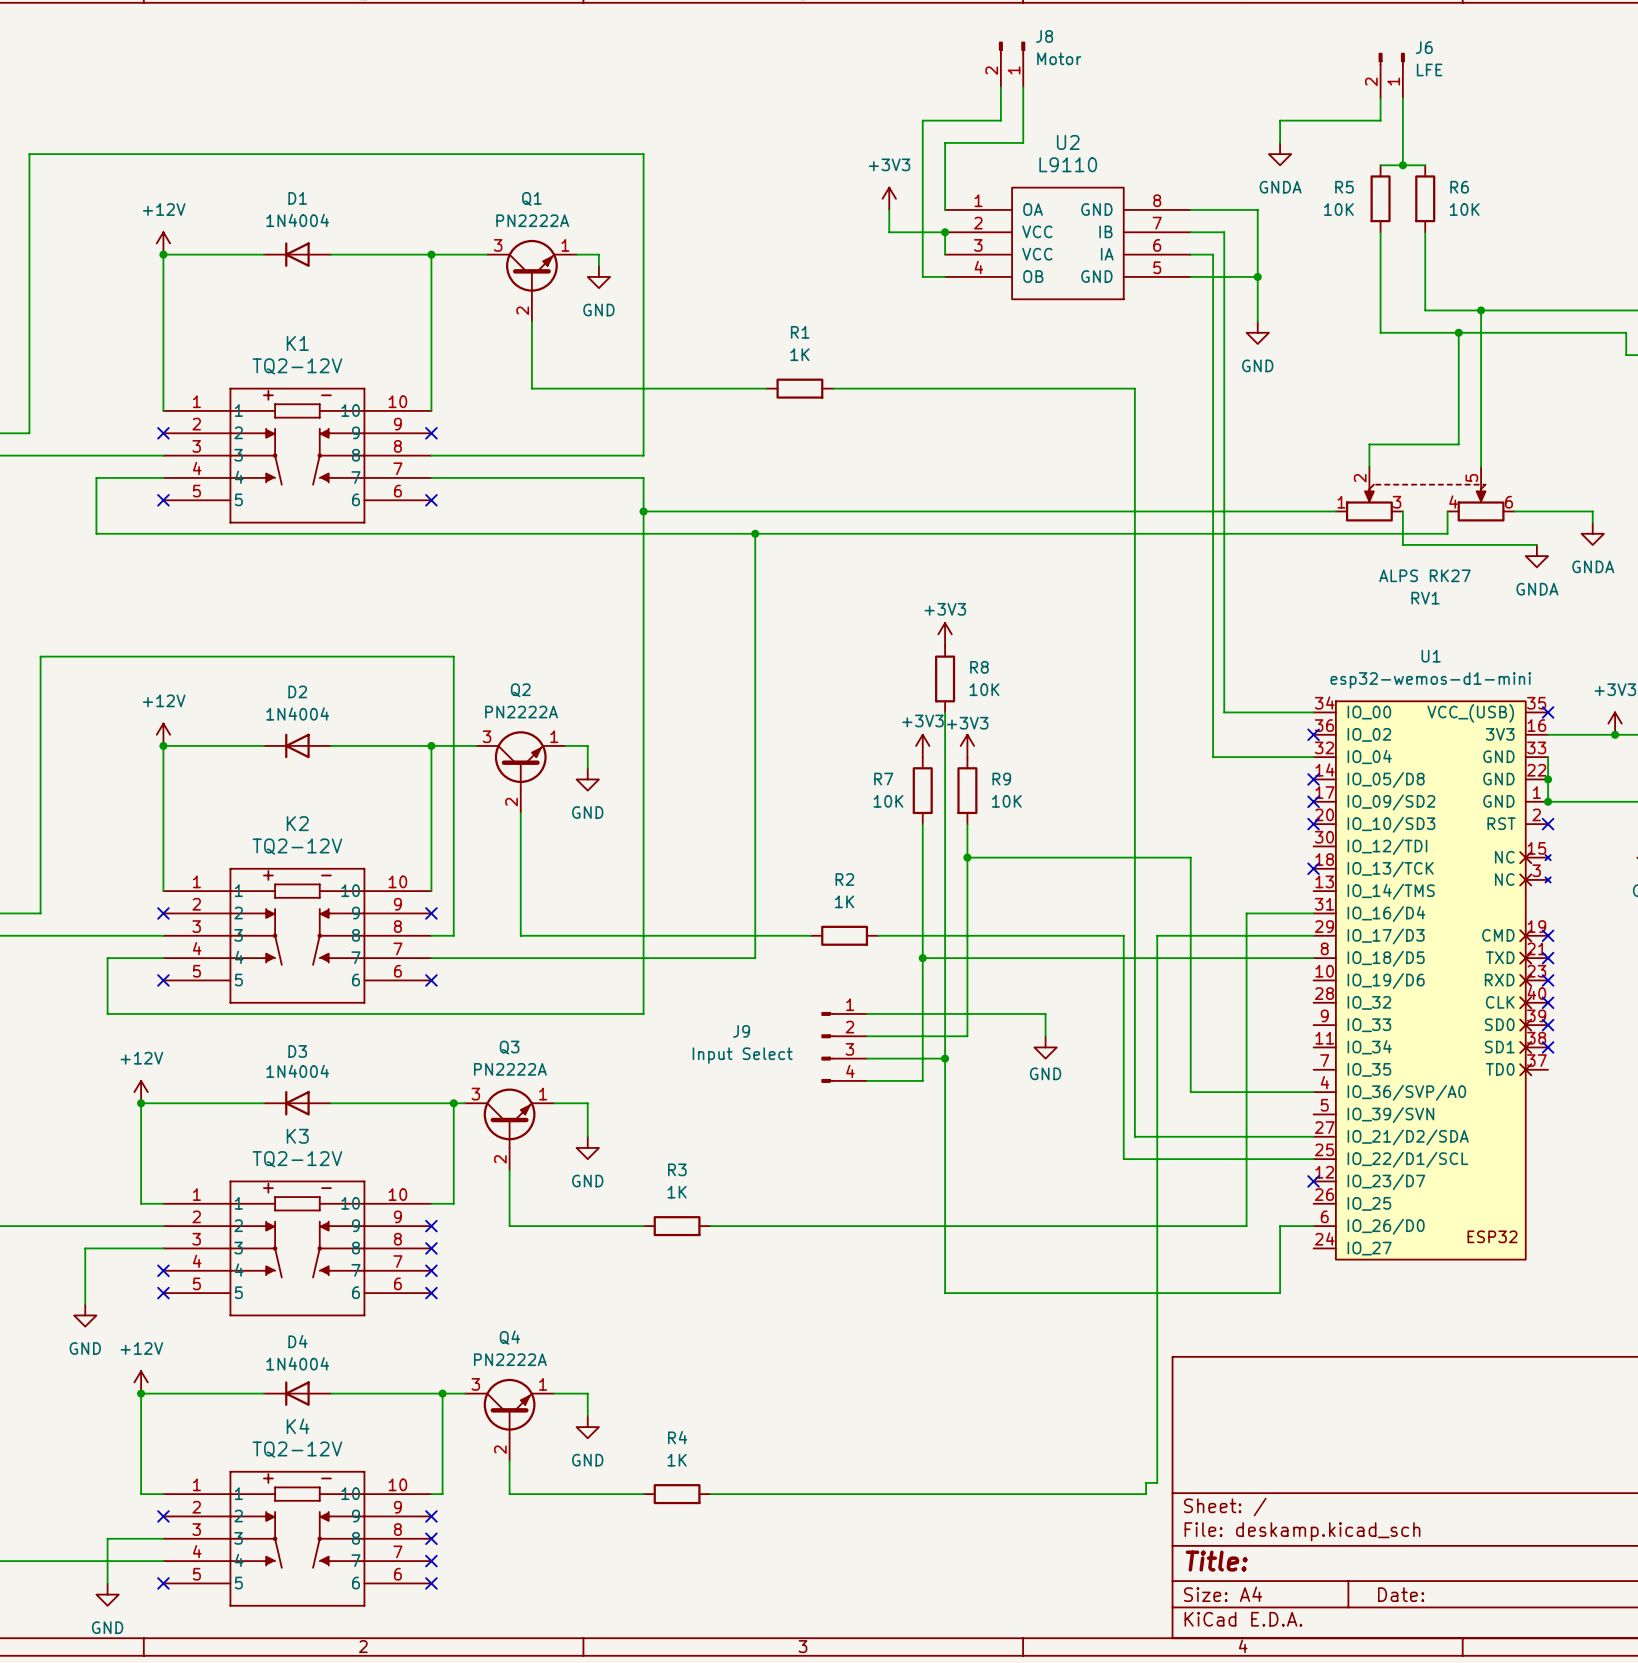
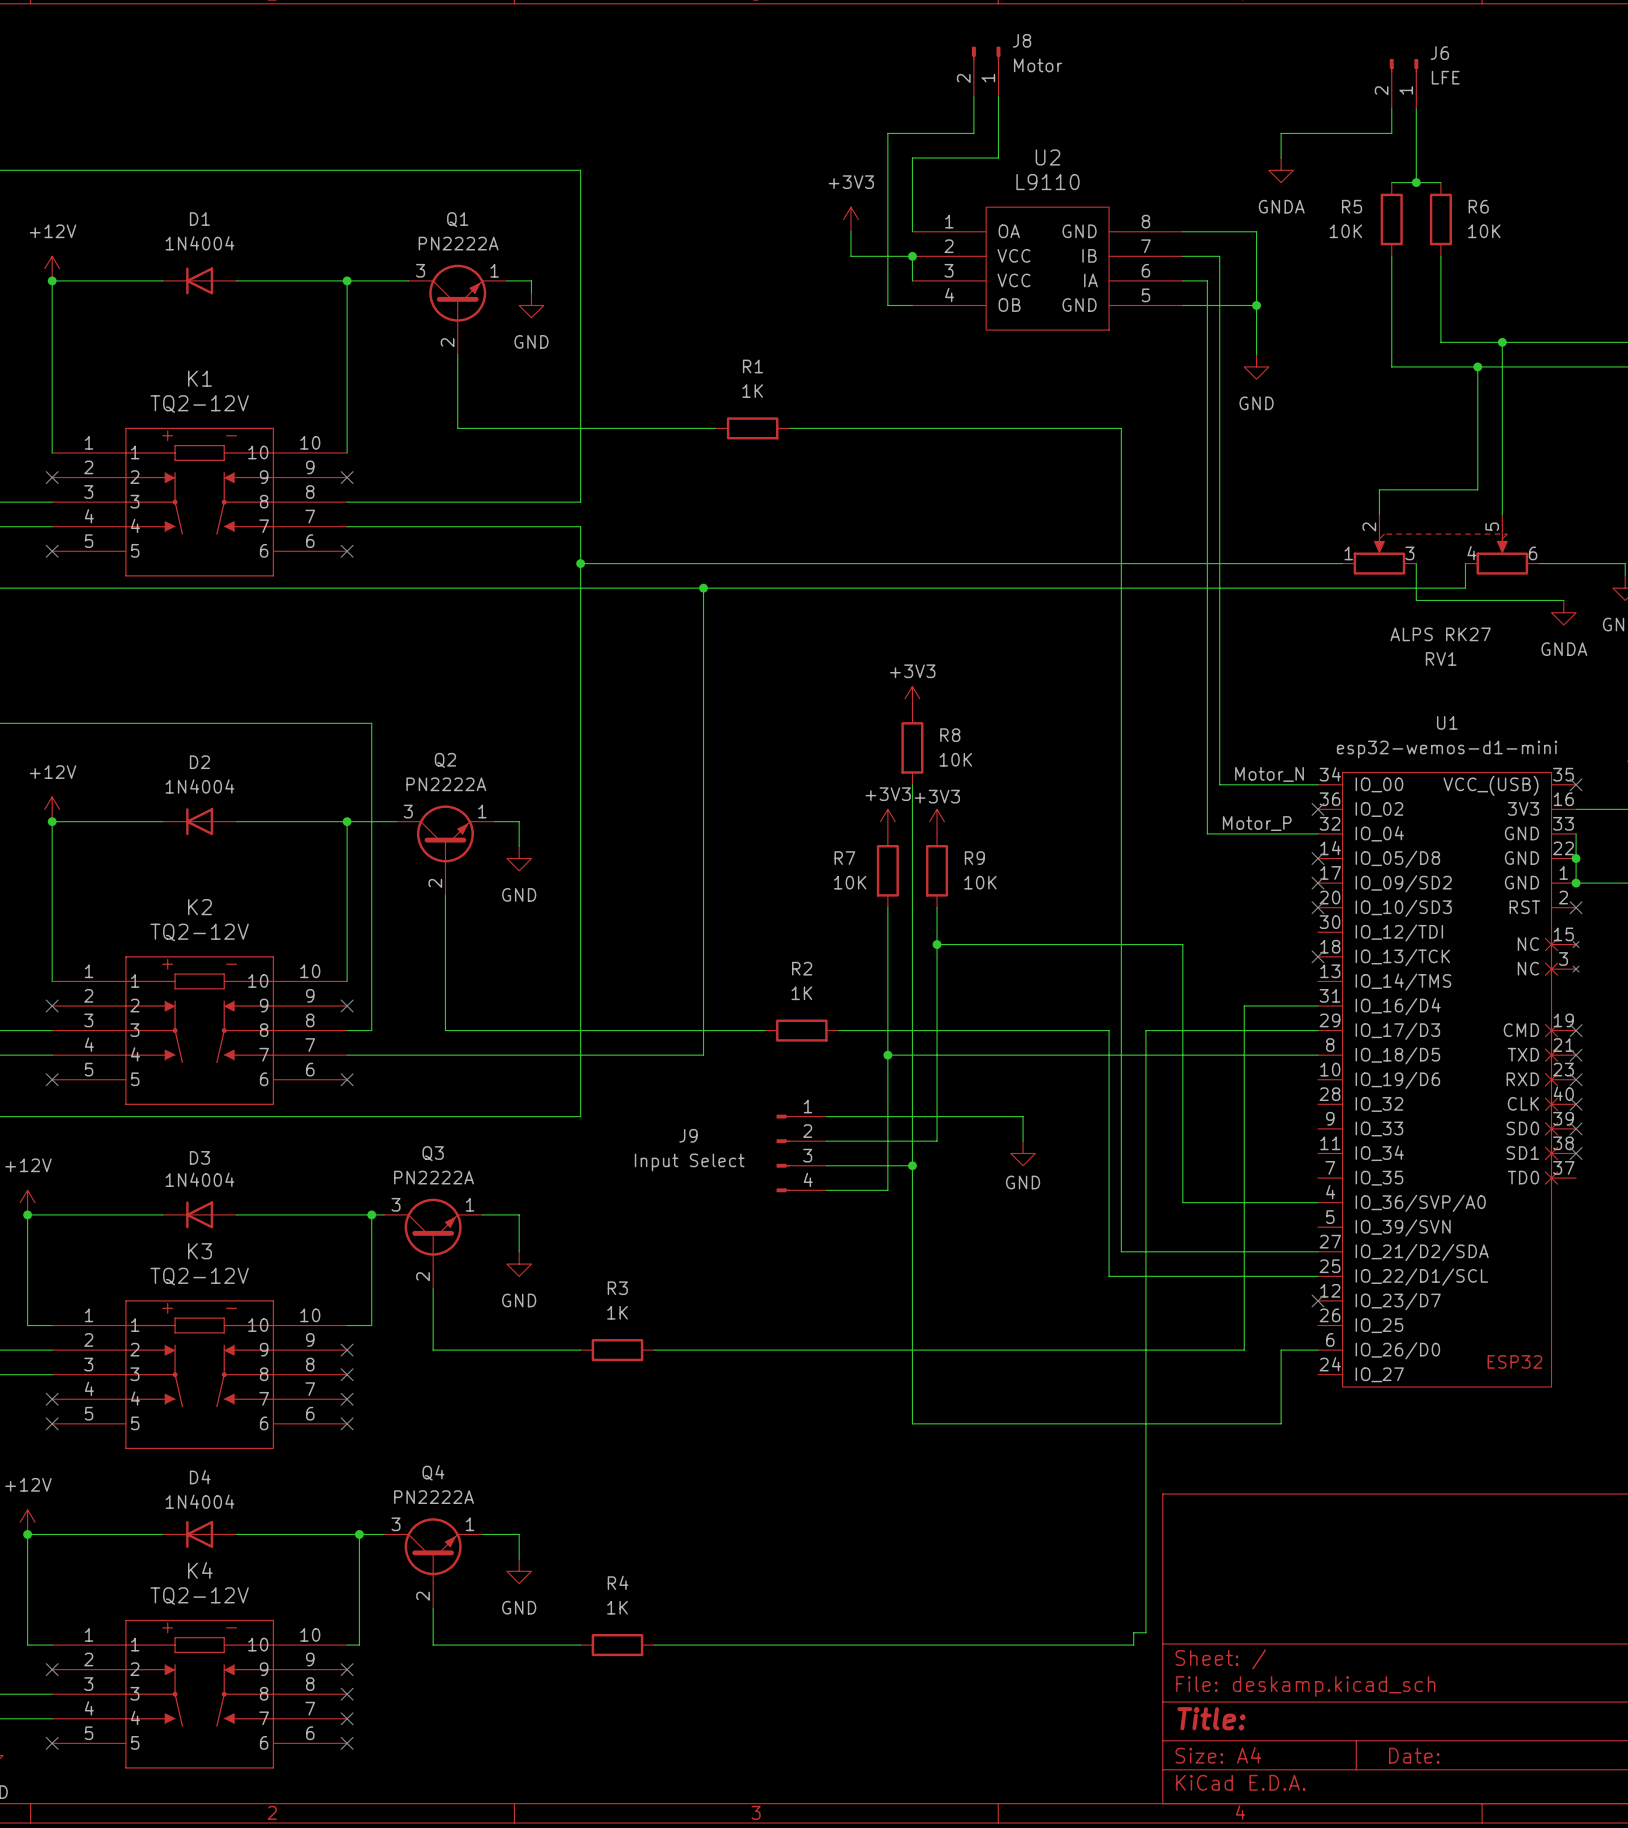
label: none -> Motor_N (1269, 774)
label: none -> Motor_P (1257, 823)

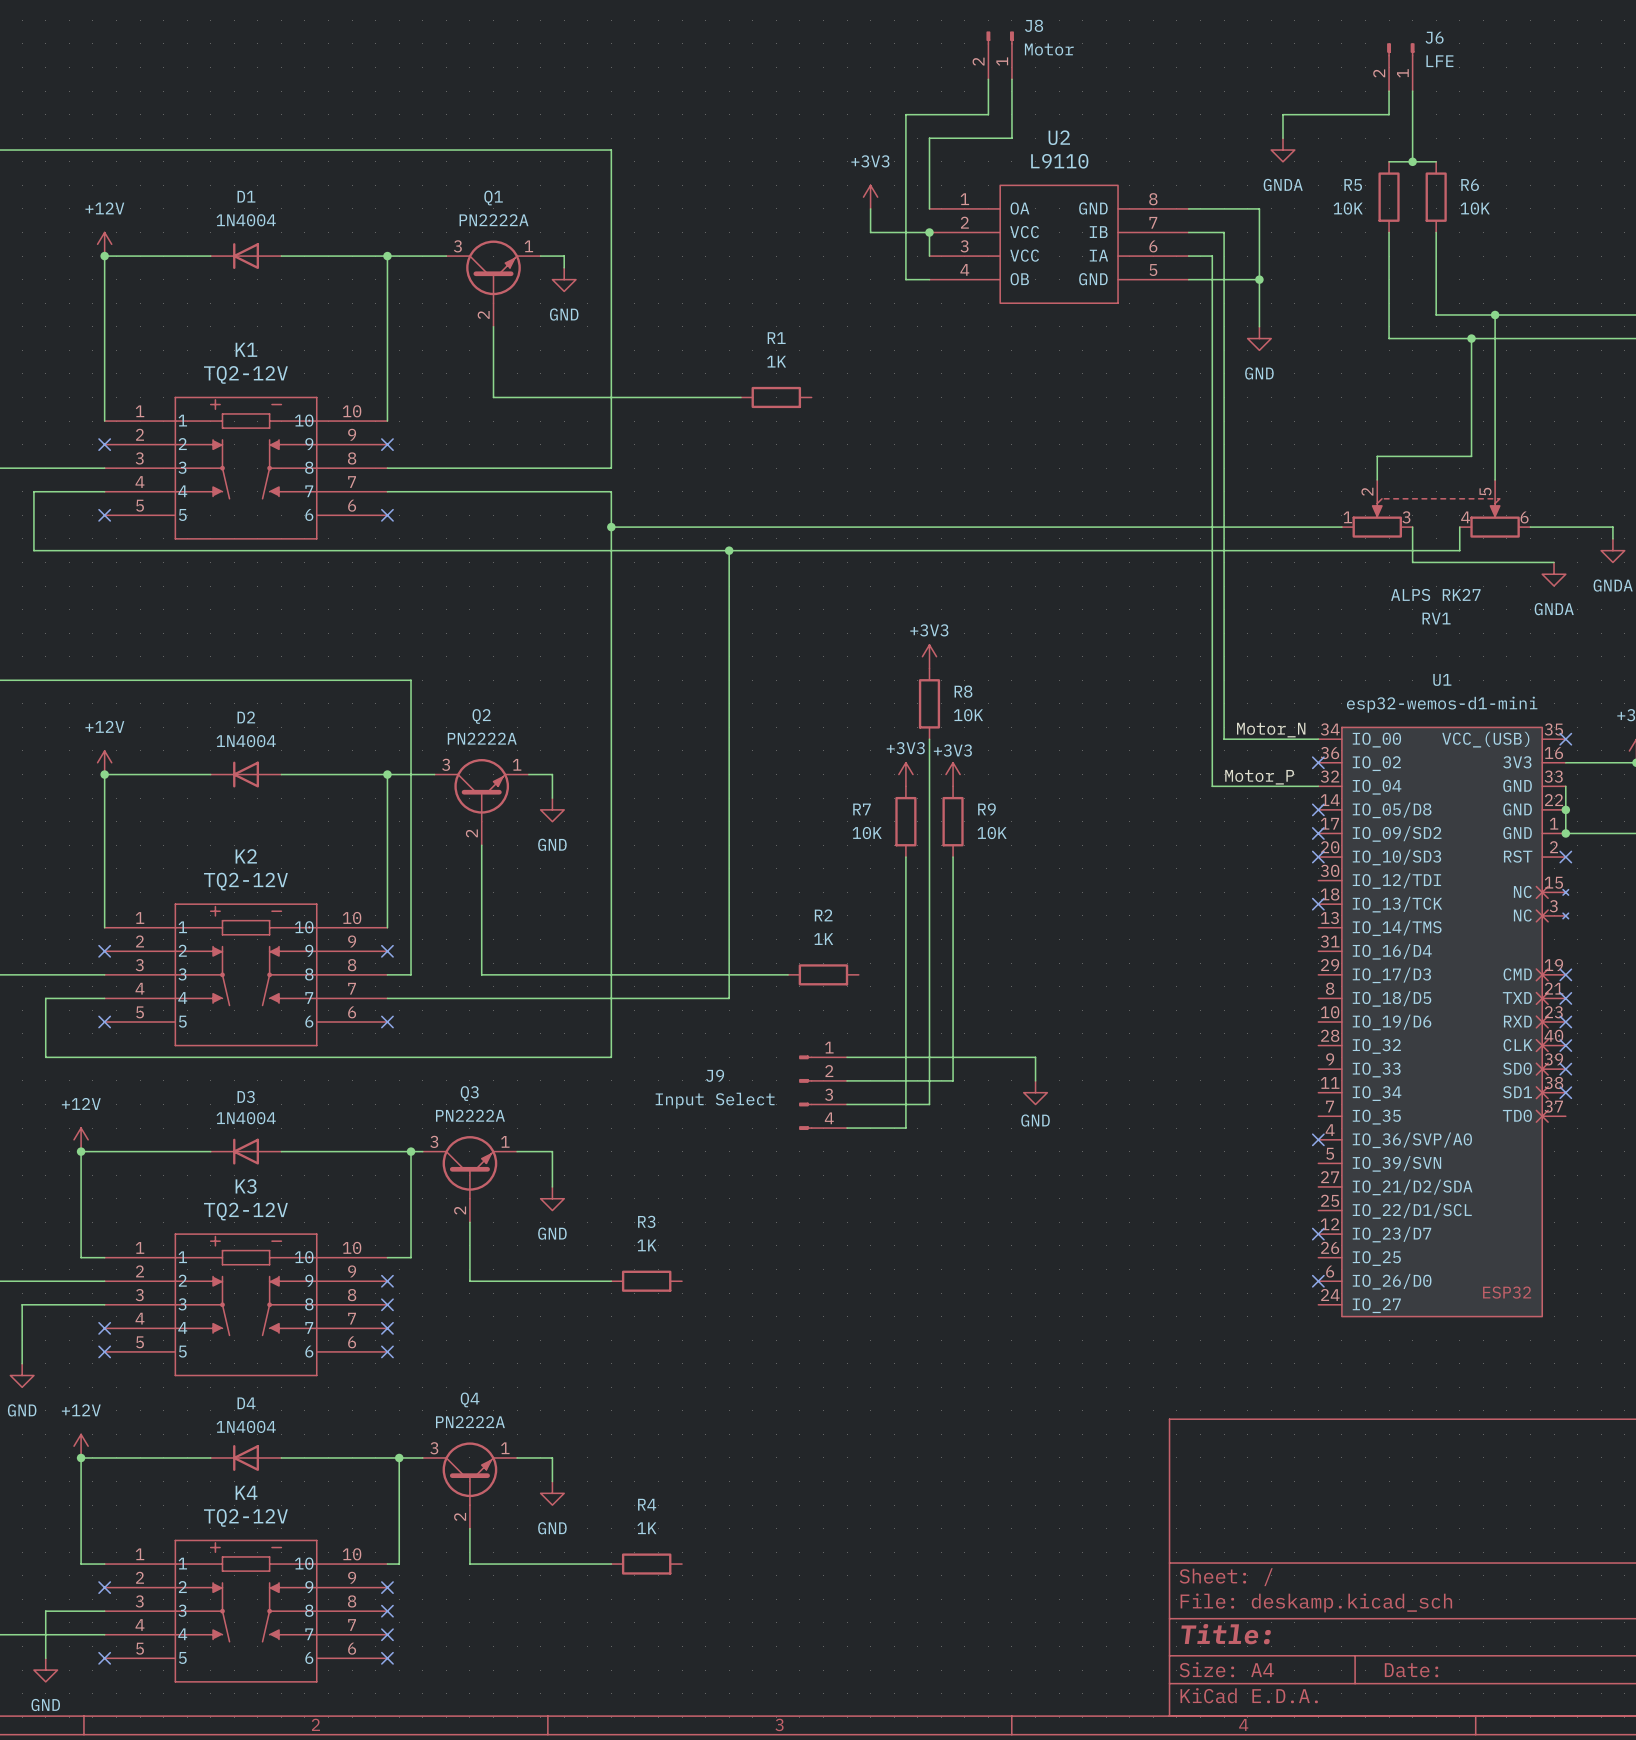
wire: (789, 428) (1121, 428) (1121, 1251) (1318, 1251) -> none
wire: (937, 944) (1182, 944) (1182, 1202) (1318, 1202) -> none
junction: (937, 944) -> none
wire: (1318, 1006) (1244, 1006) (1244, 1350) (654, 1350) -> none
wire: (838, 1030) (1109, 1030) (1109, 1276) (1318, 1276) -> none
wire: (1318, 1030) (1145, 1030) (1145, 1632) (1133, 1632) (1133, 1645) (654, 1645) -> none
wire: (887, 1055) (1318, 1055) -> none
junction: (887, 1055) -> none
wire: (912, 1165) (912, 1423) (1281, 1423) (1281, 1350) (1318, 1350) -> none
junction: (912, 1165) -> none
no-connect mark: none -> (1318, 1139)
no-connect mark: none -> (1318, 1281)

